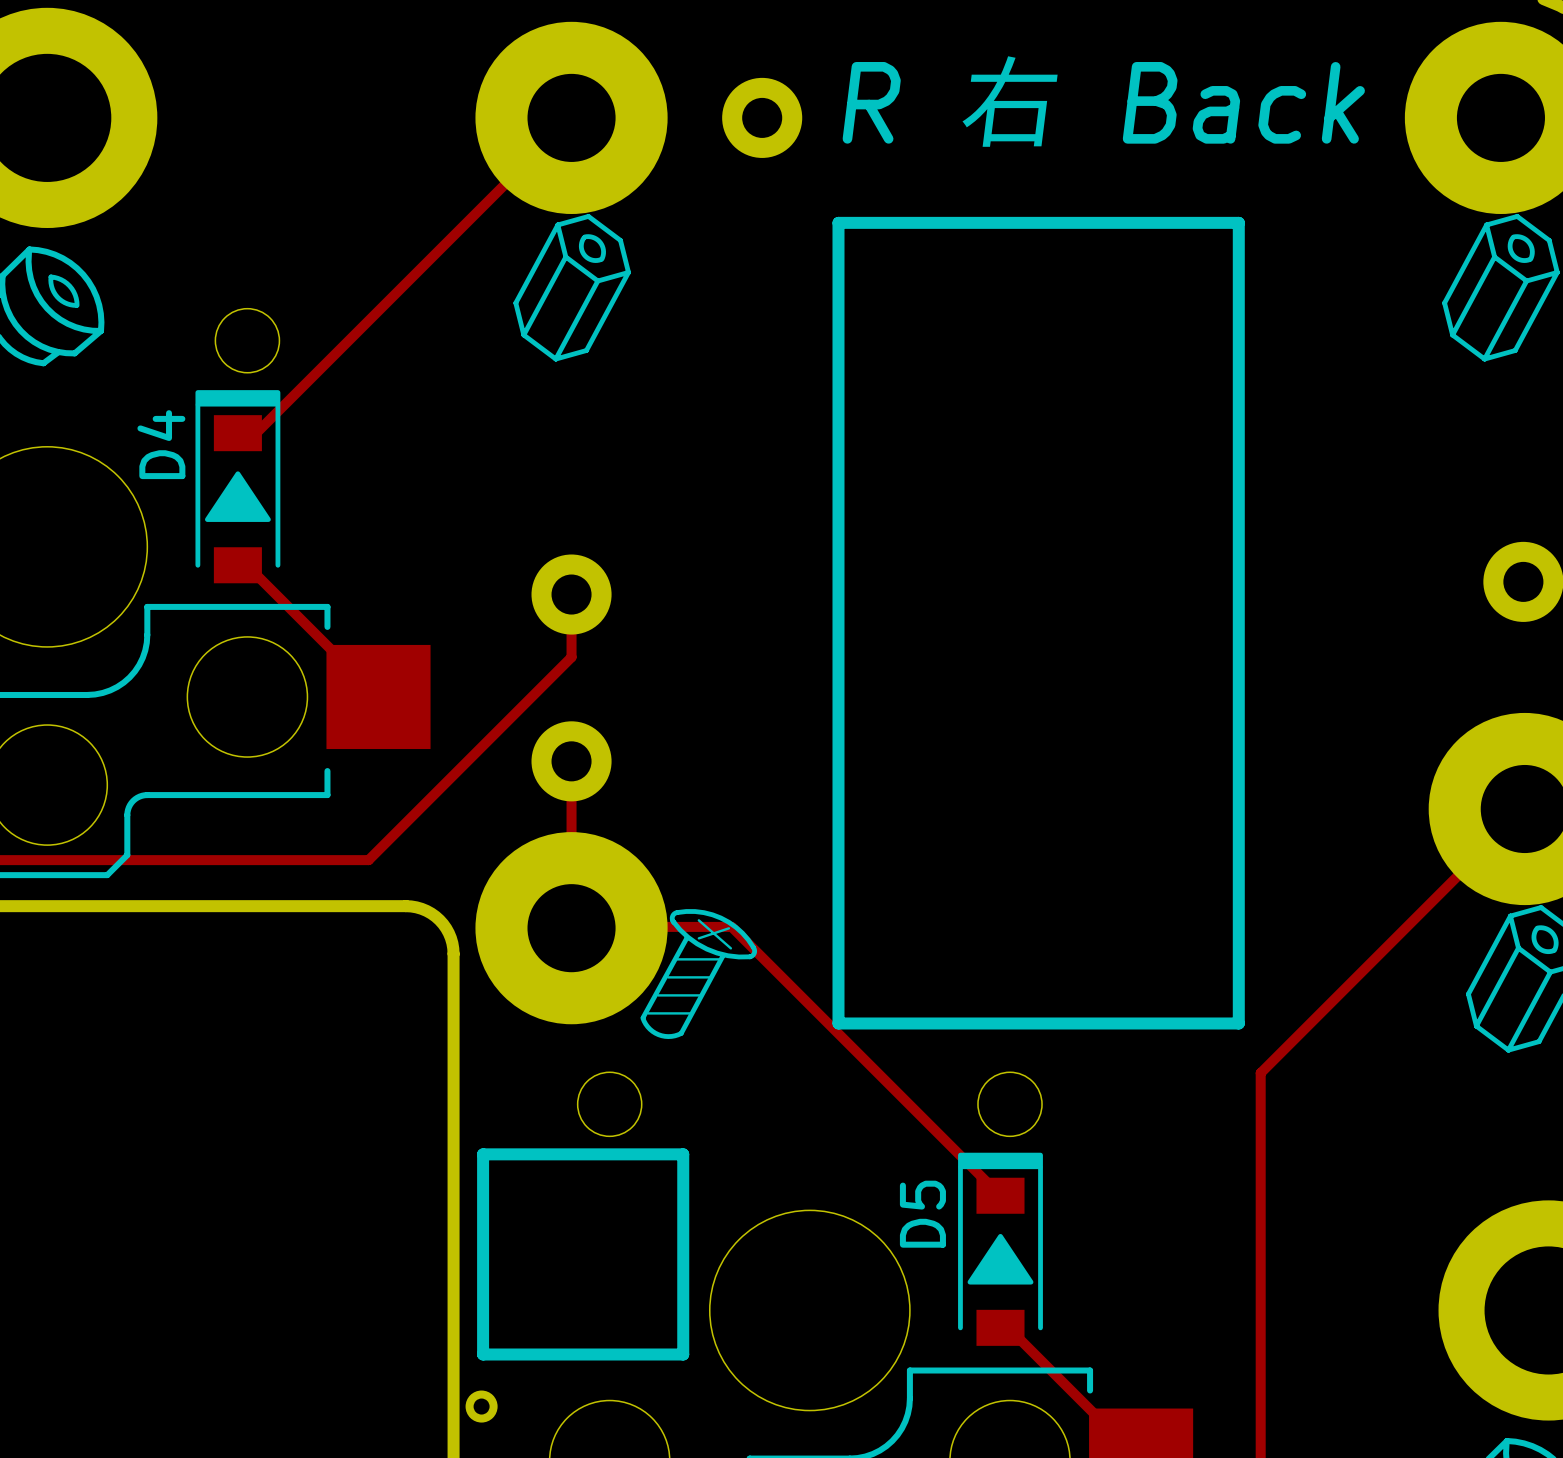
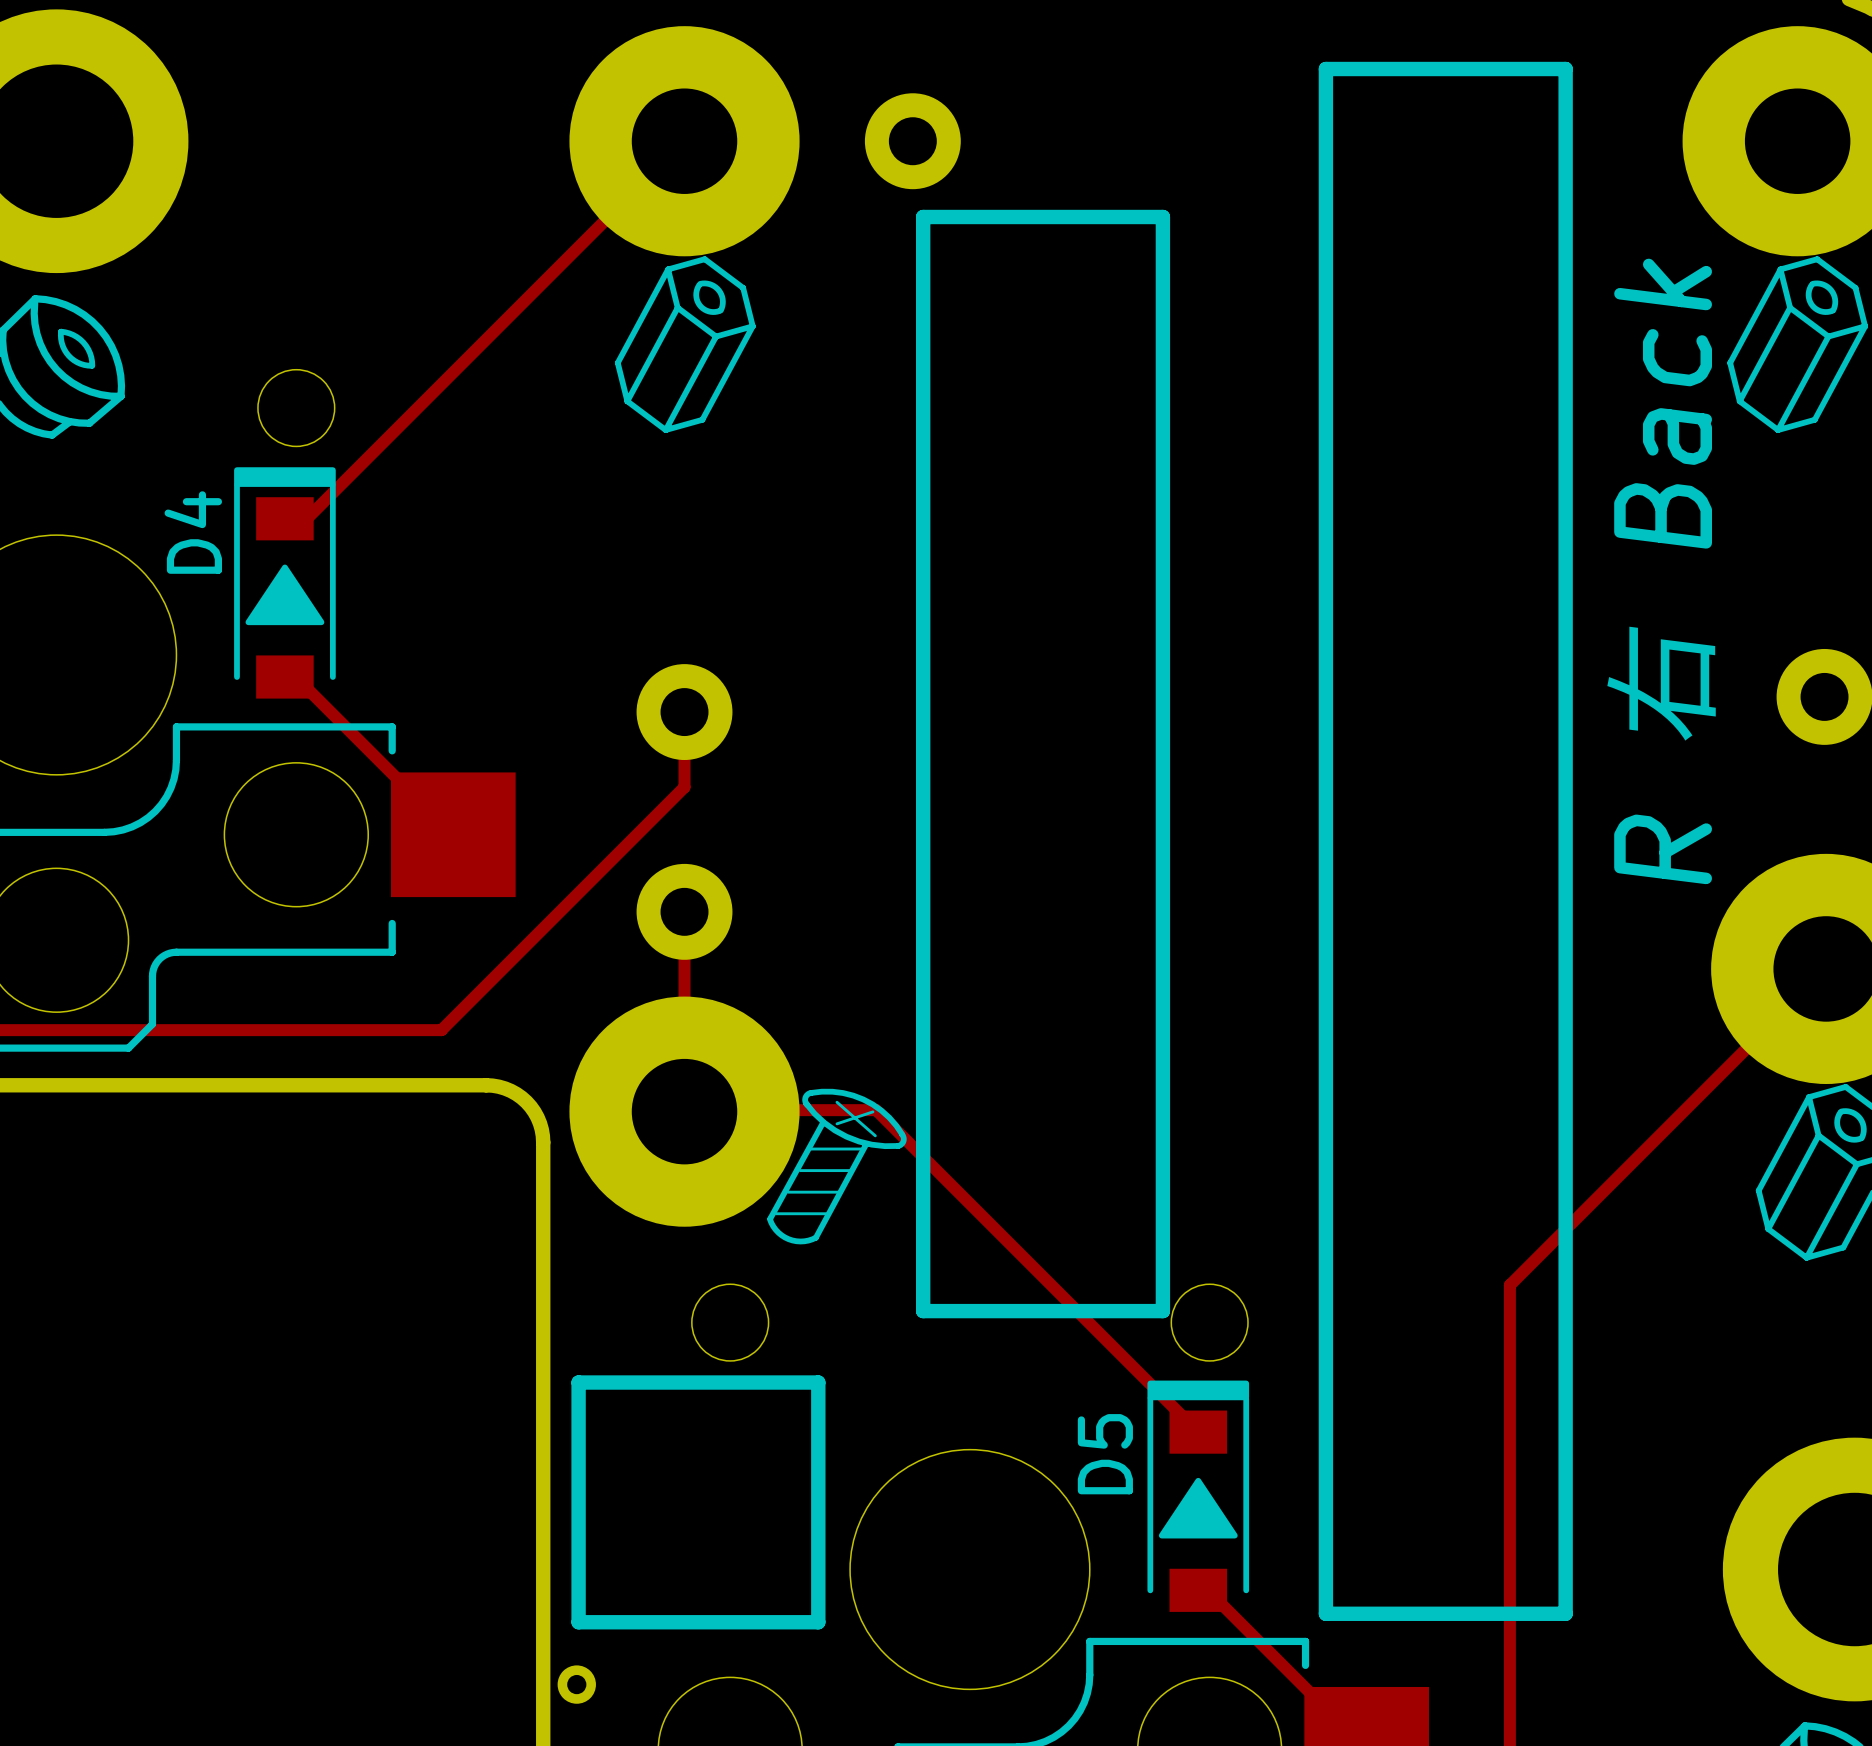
line: none -> (1325, 69) (1565, 69) (1565, 1613) (1325, 1613) (1325, 69)
text rotation: 0° (1103, 101) -> 90° counterclockwise (1661, 571)
line: none -> (923, 216) (1162, 216) (1162, 1311) (923, 1311) (923, 216)
line: (838, 222) (1238, 222) (1238, 1023) (838, 1023) (838, 222) -> none

